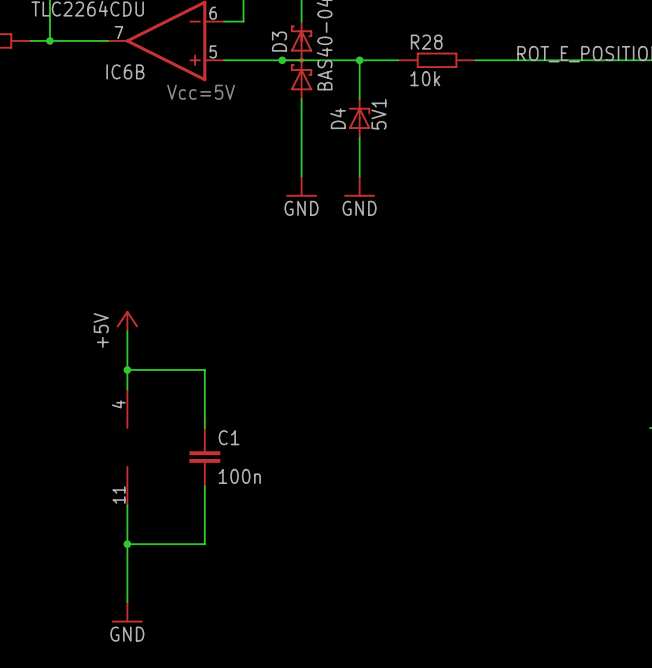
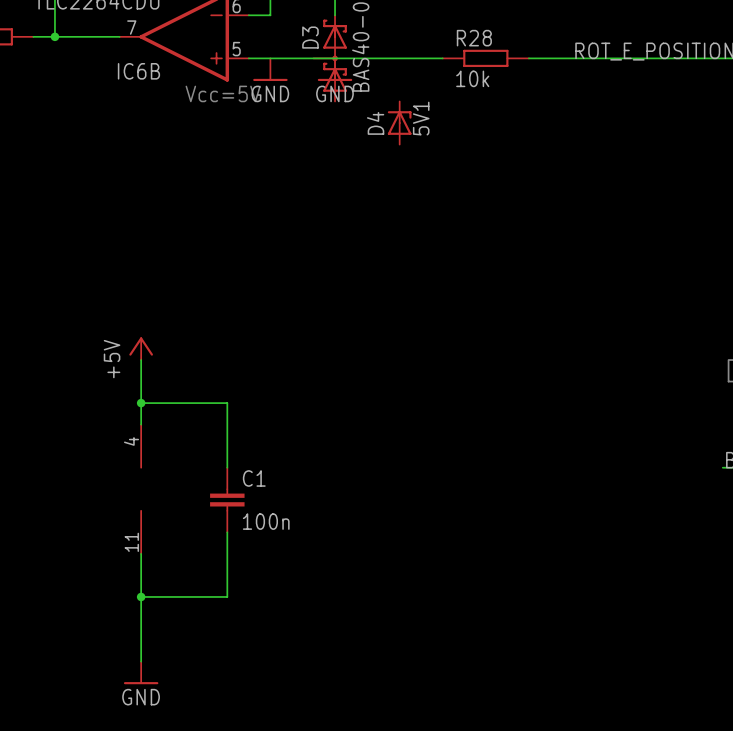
junction: (282, 60) -> none
wire: (359, 60) (359, 99) -> none
junction: (359, 60) -> none
power symbol: none -> GND (270, 69)
power symbol: none -> GND (335, 69)
wire: (301, 99) (301, 176) -> none
wire: (359, 137) (359, 176) -> none
power symbol: GND (301, 186) -> none
power symbol: GND (359, 186) -> none

